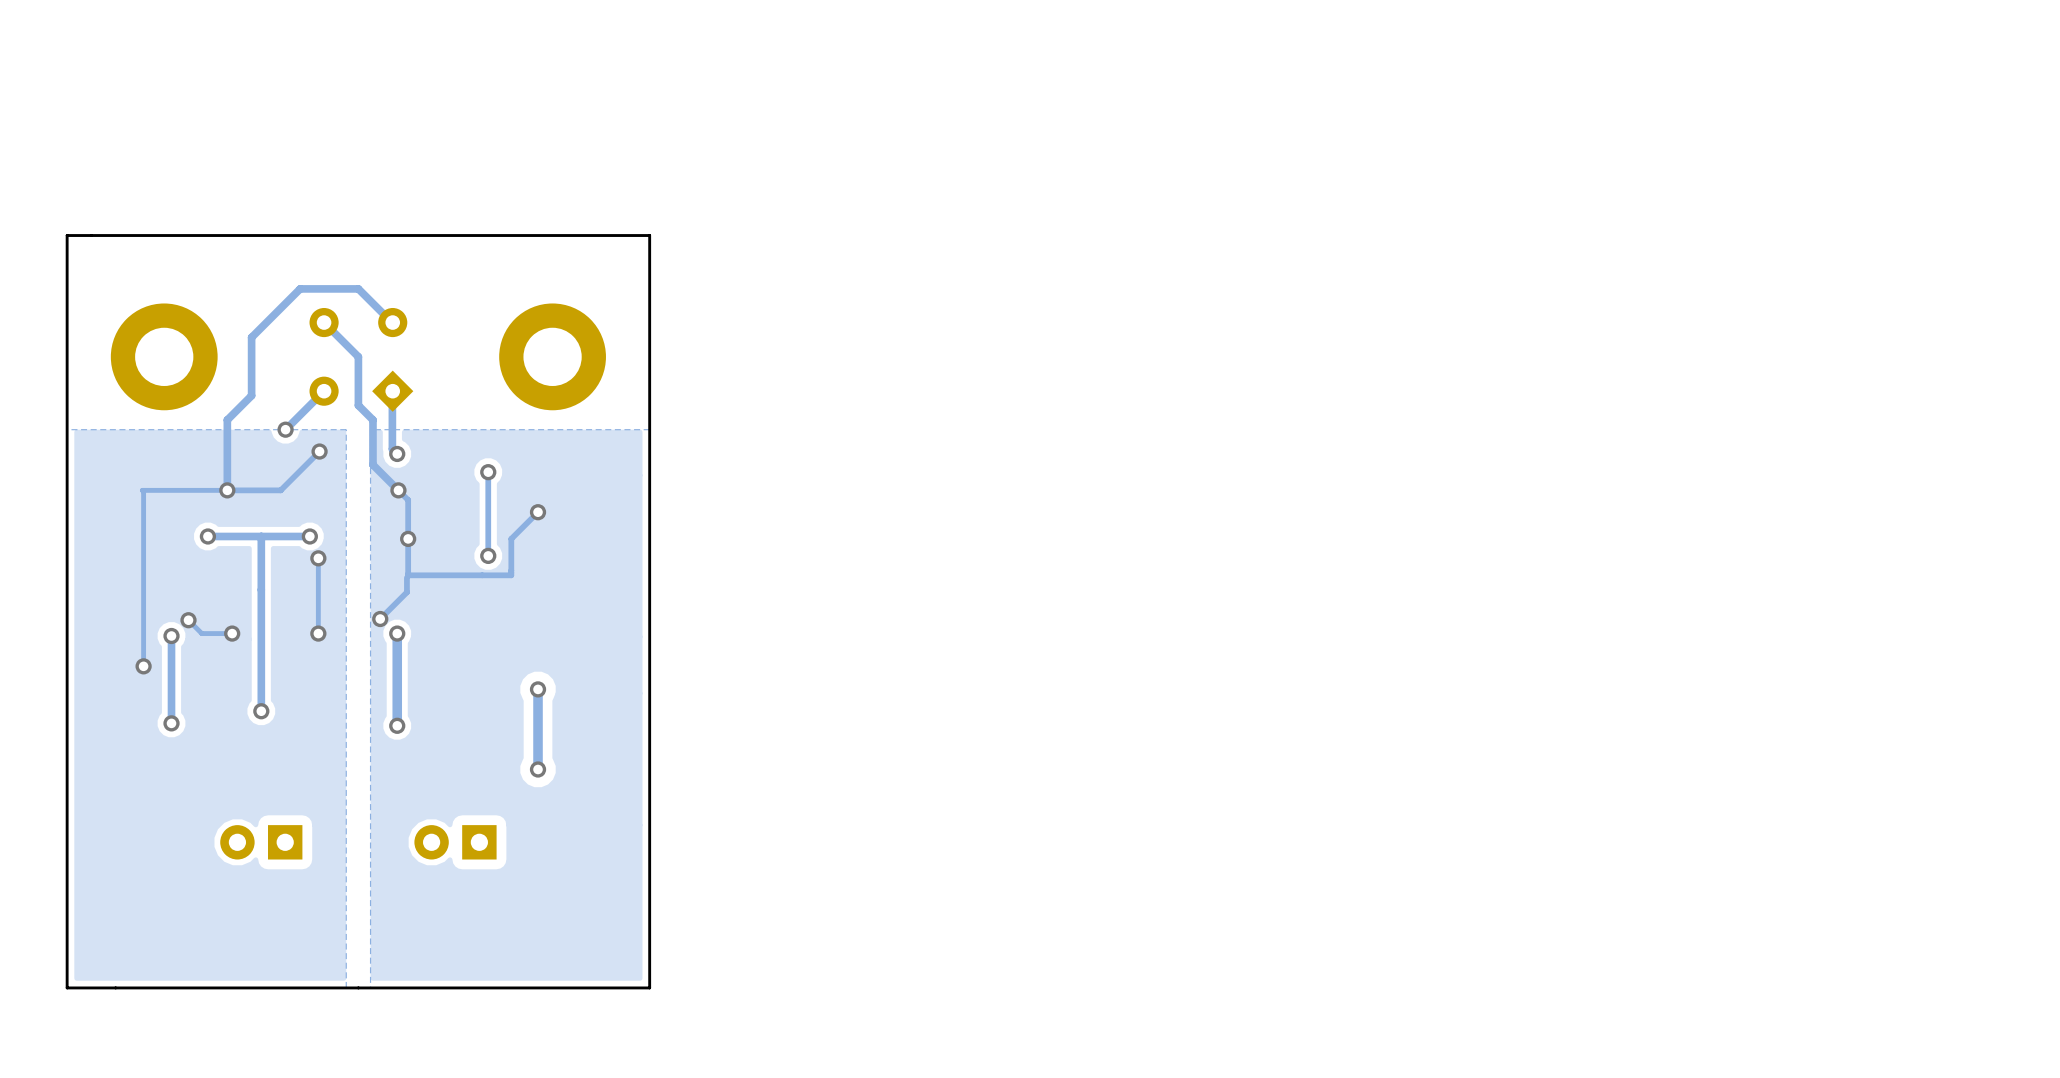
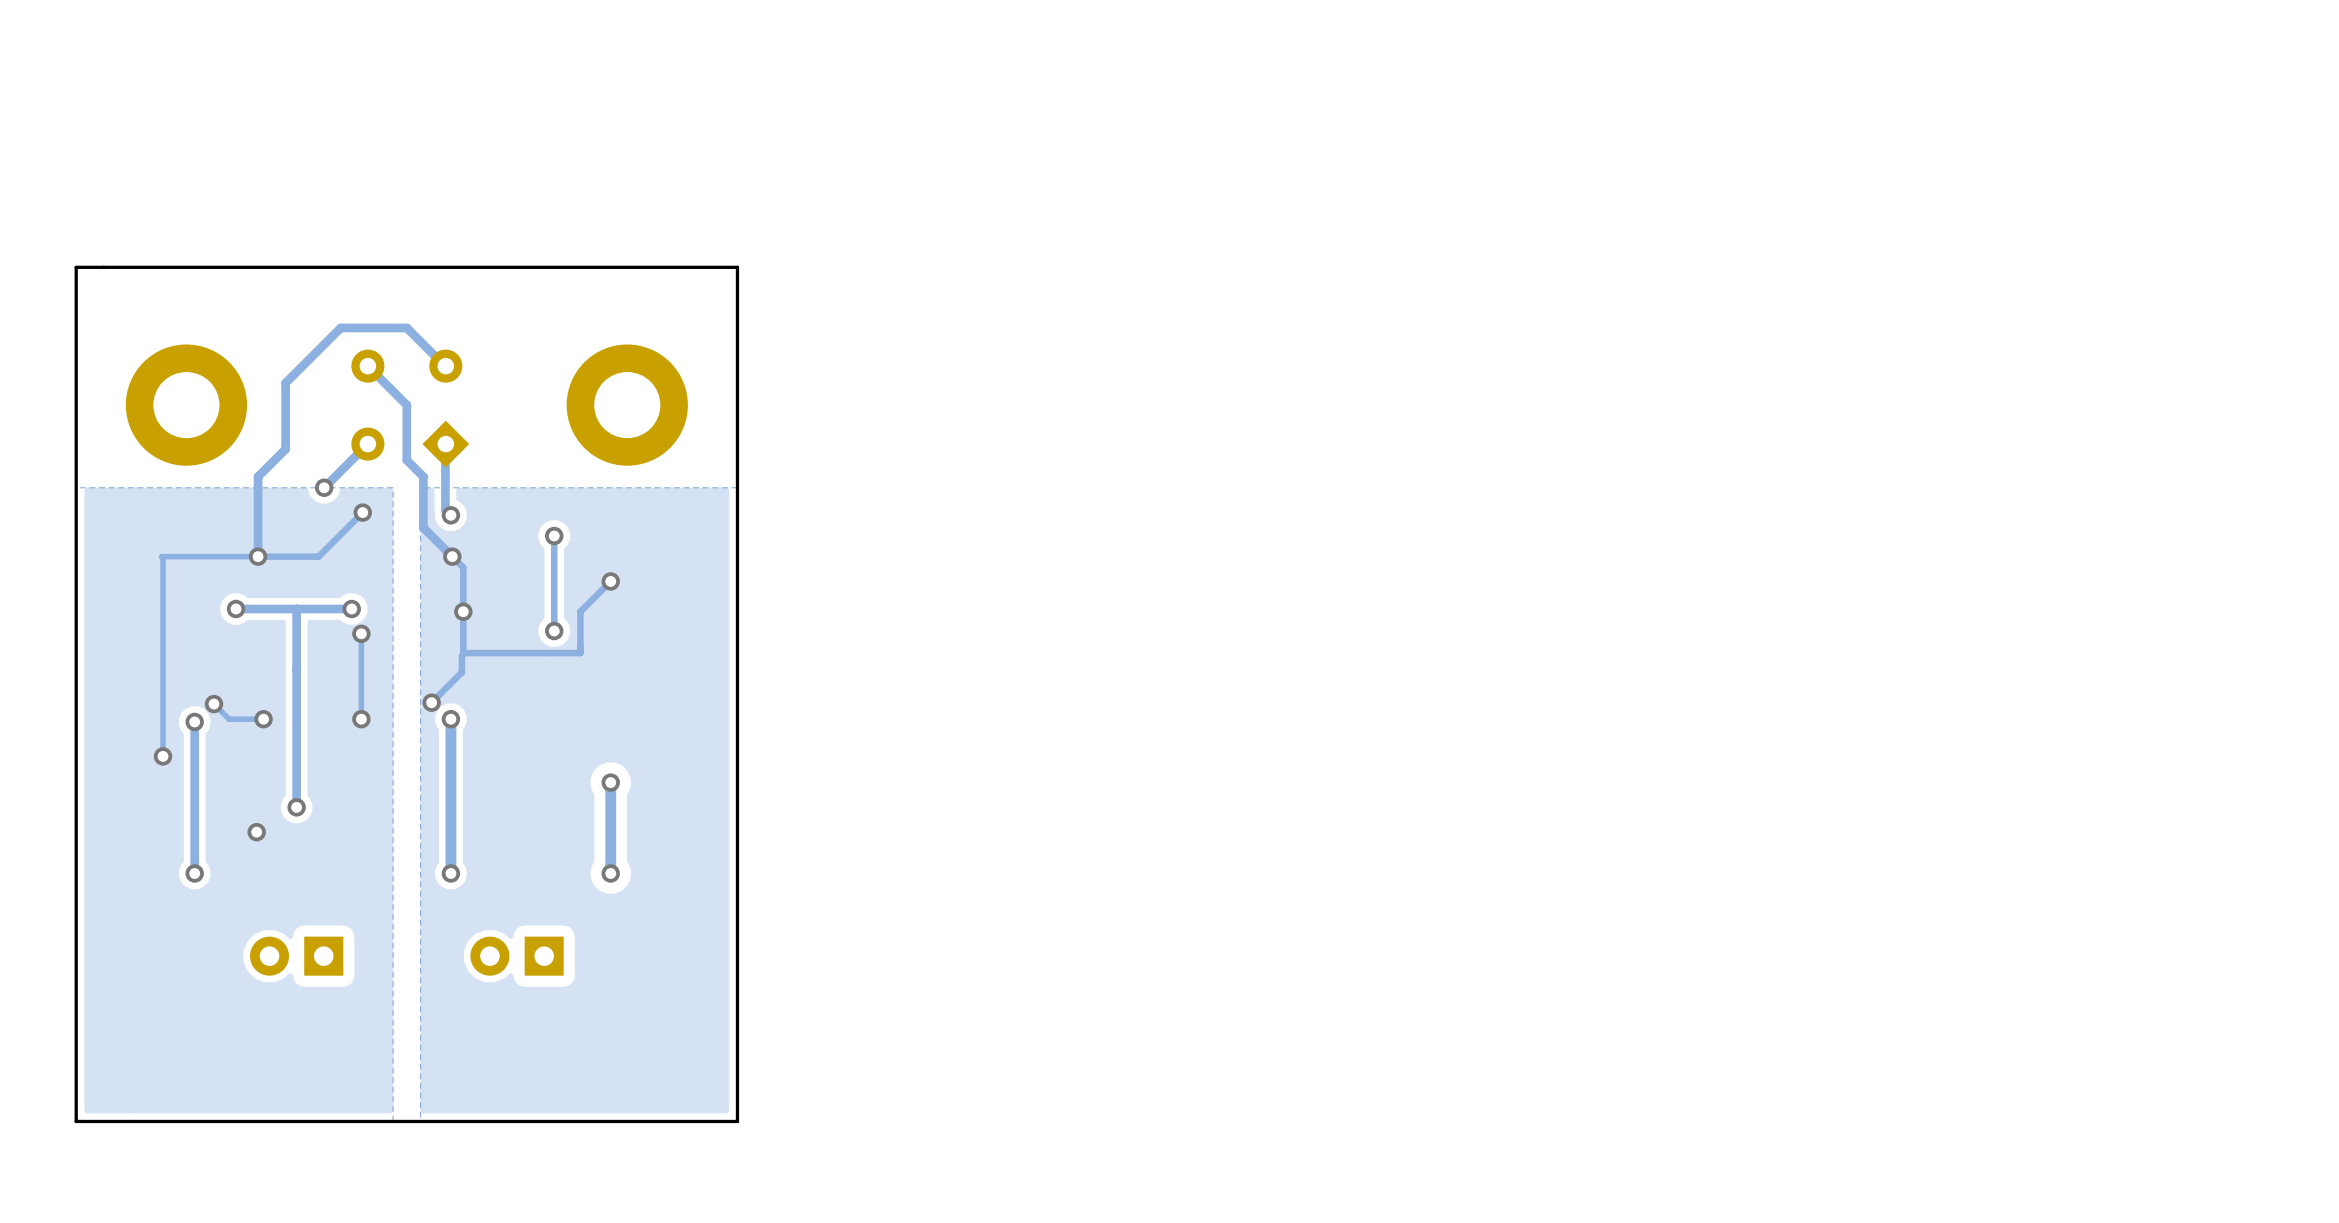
track: none -> (194, 821) (194, 873)
via: (171, 723) -> none
track: none -> (450, 823) (450, 873)
via position: (397, 725) -> (450, 873)
via: none -> (256, 832)
via: none -> (194, 873)

